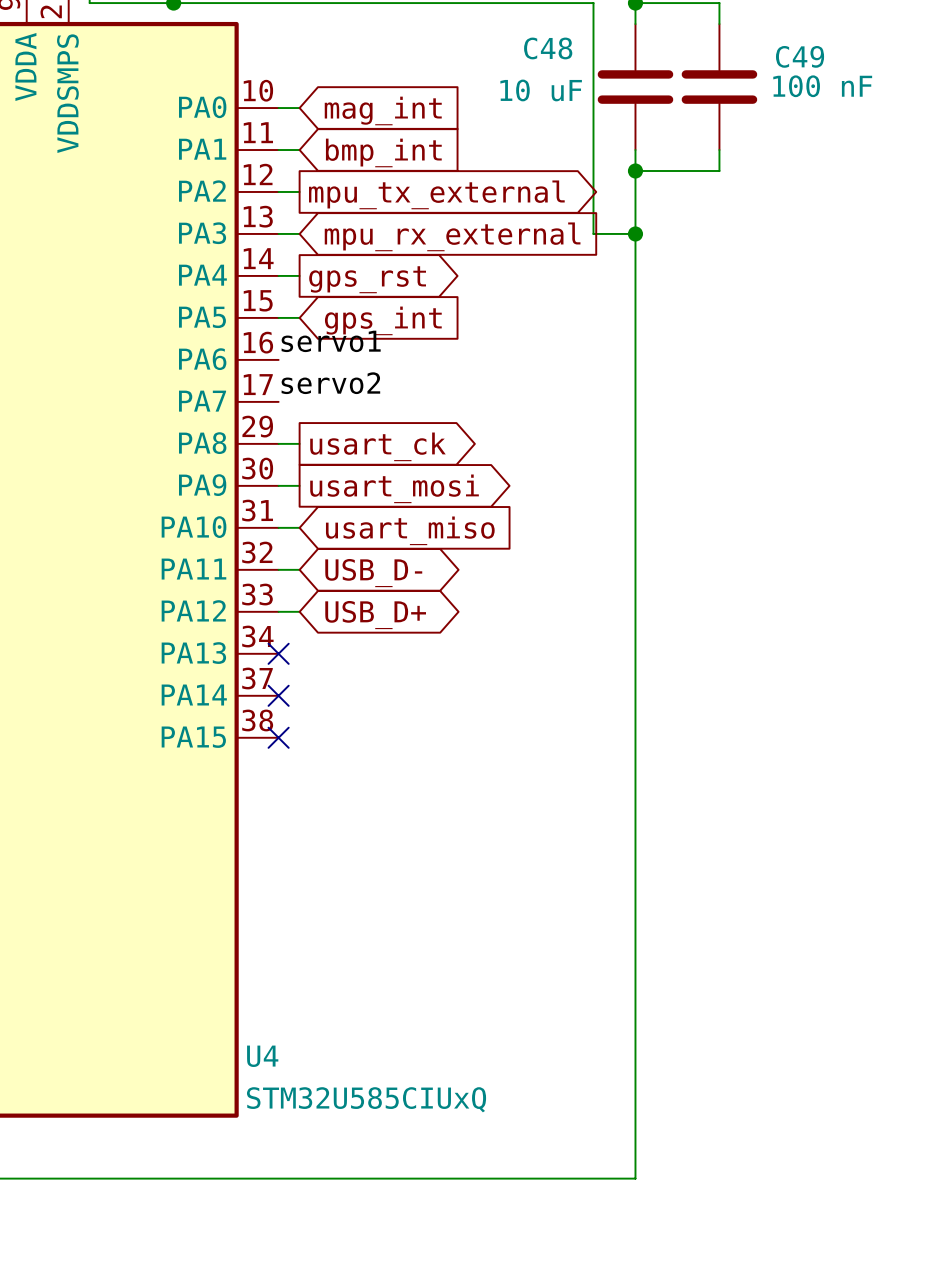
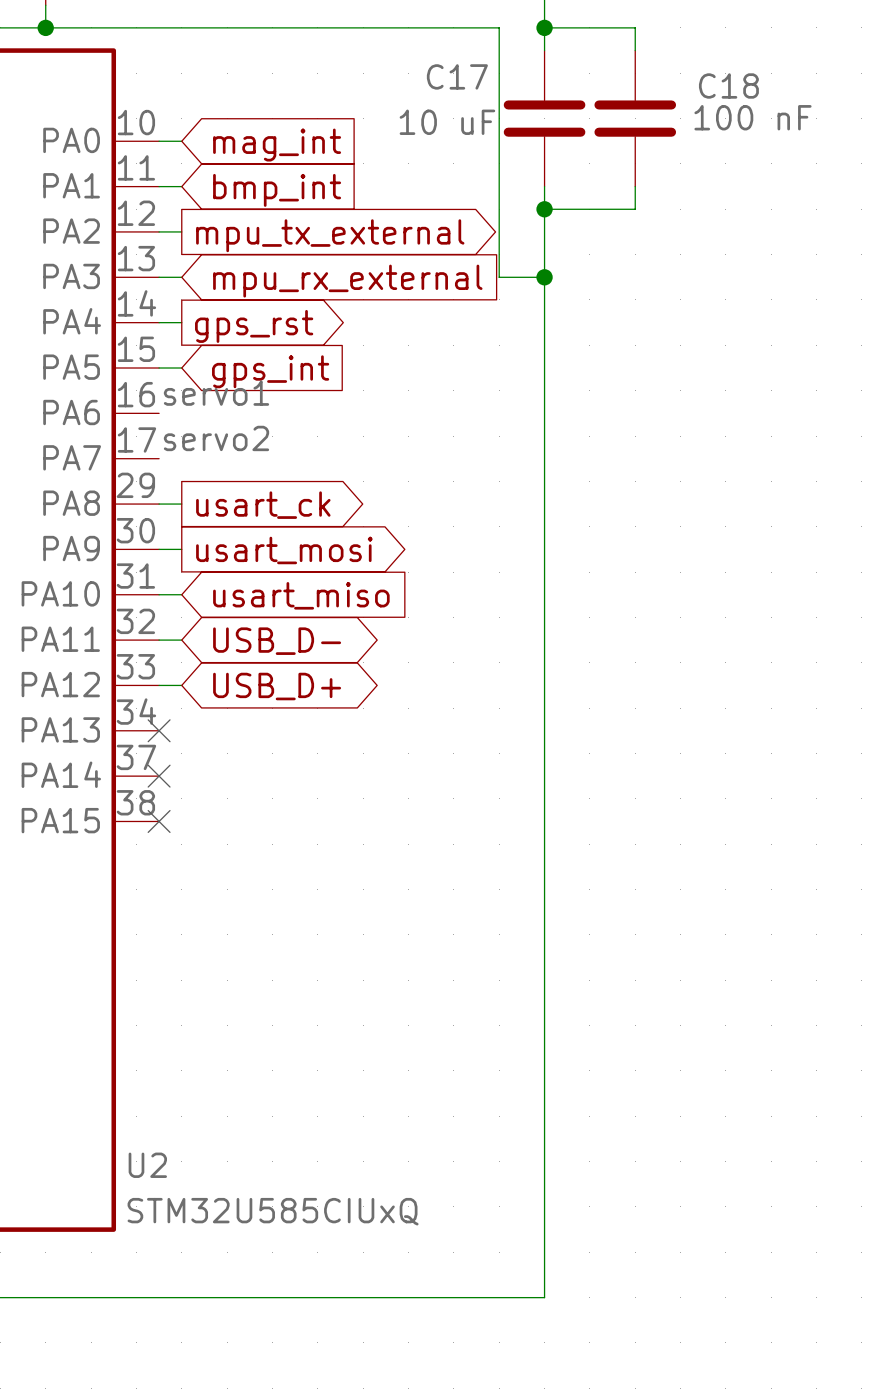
C48 name: C48 (548, 48) -> C17 (457, 76)
C49 name: C49 (800, 56) -> C18 (728, 85)
U4 name: U4 (262, 1056) -> U2 (147, 1165)

